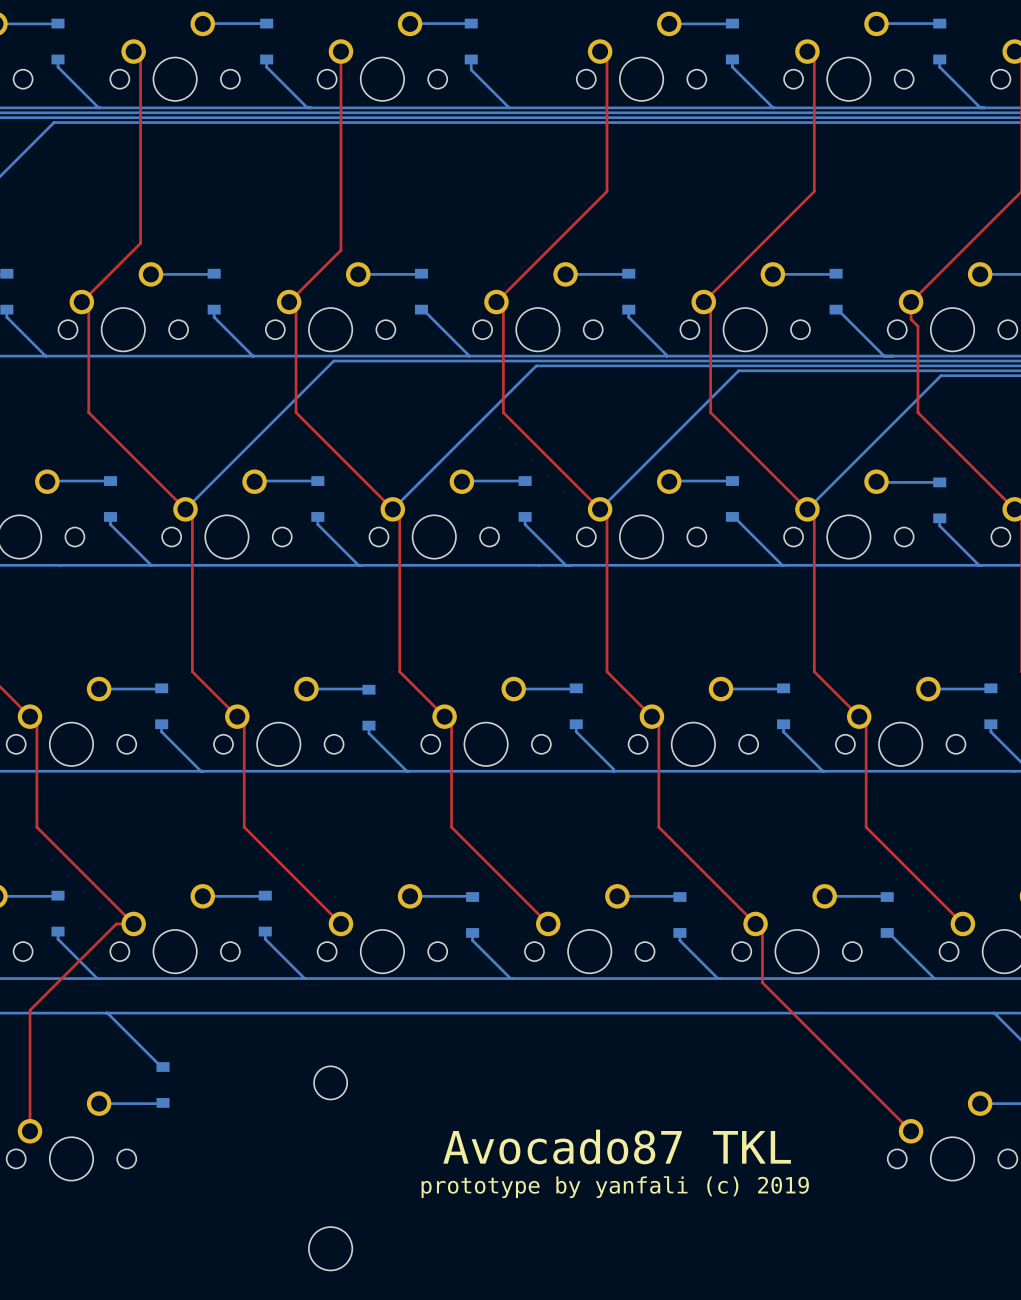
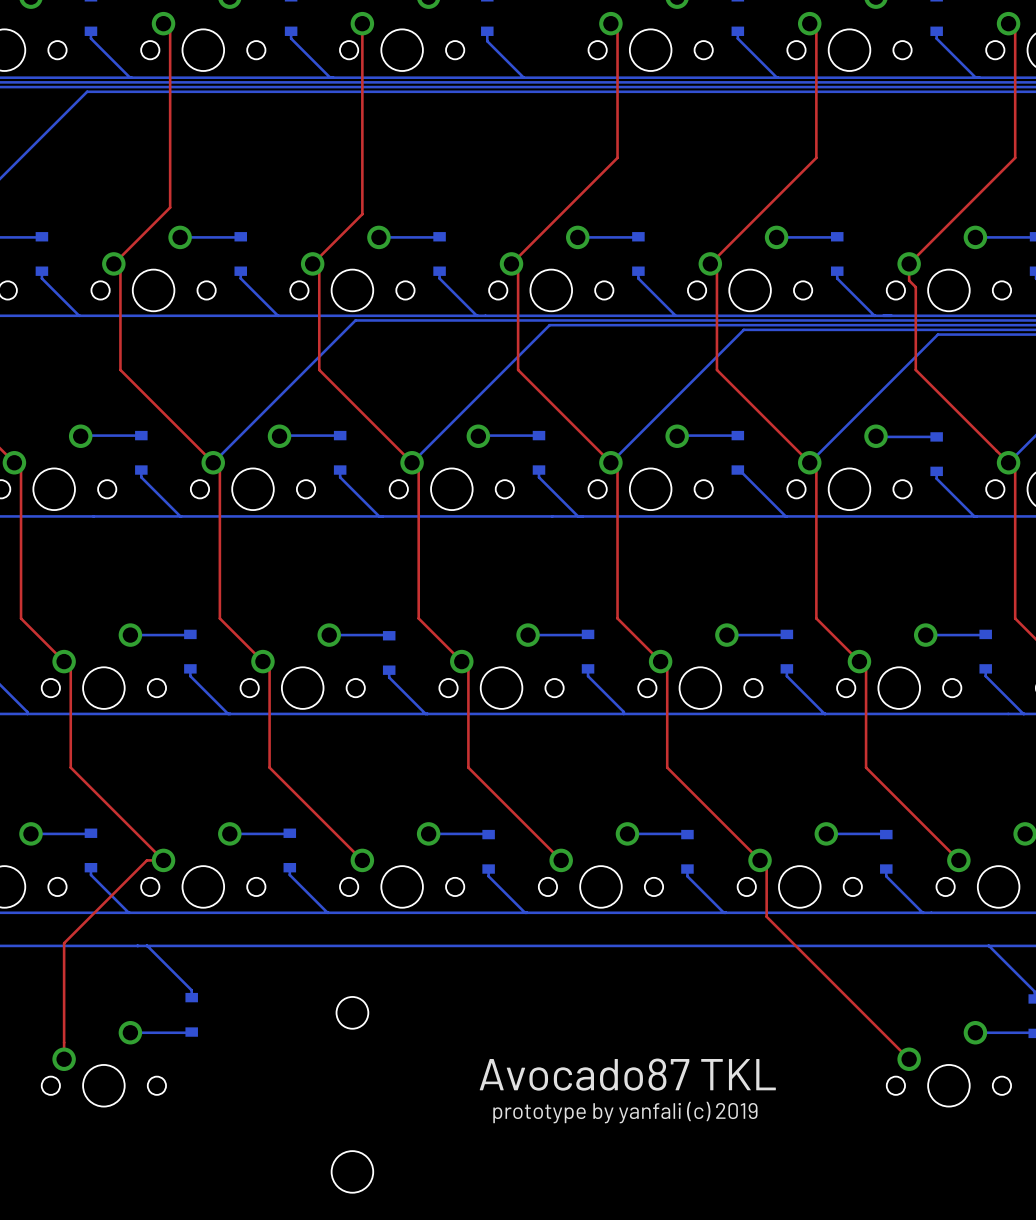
bottom track: none -> (439, 271) (439, 278) (476, 315)
bottom track: (423, 309) (469, 356) -> none
bottom track: none -> (837, 271) (837, 278) (874, 315)
bottom track: (837, 309) (884, 356) -> none
bottom track: none -> (886, 869) (886, 876) (922, 912)
bottom track: (888, 932) (934, 978) -> none
bottom track: (107, 1013) (161, 1067) -> none
bottom track: none -> (147, 945) (191, 990) (191, 997)

